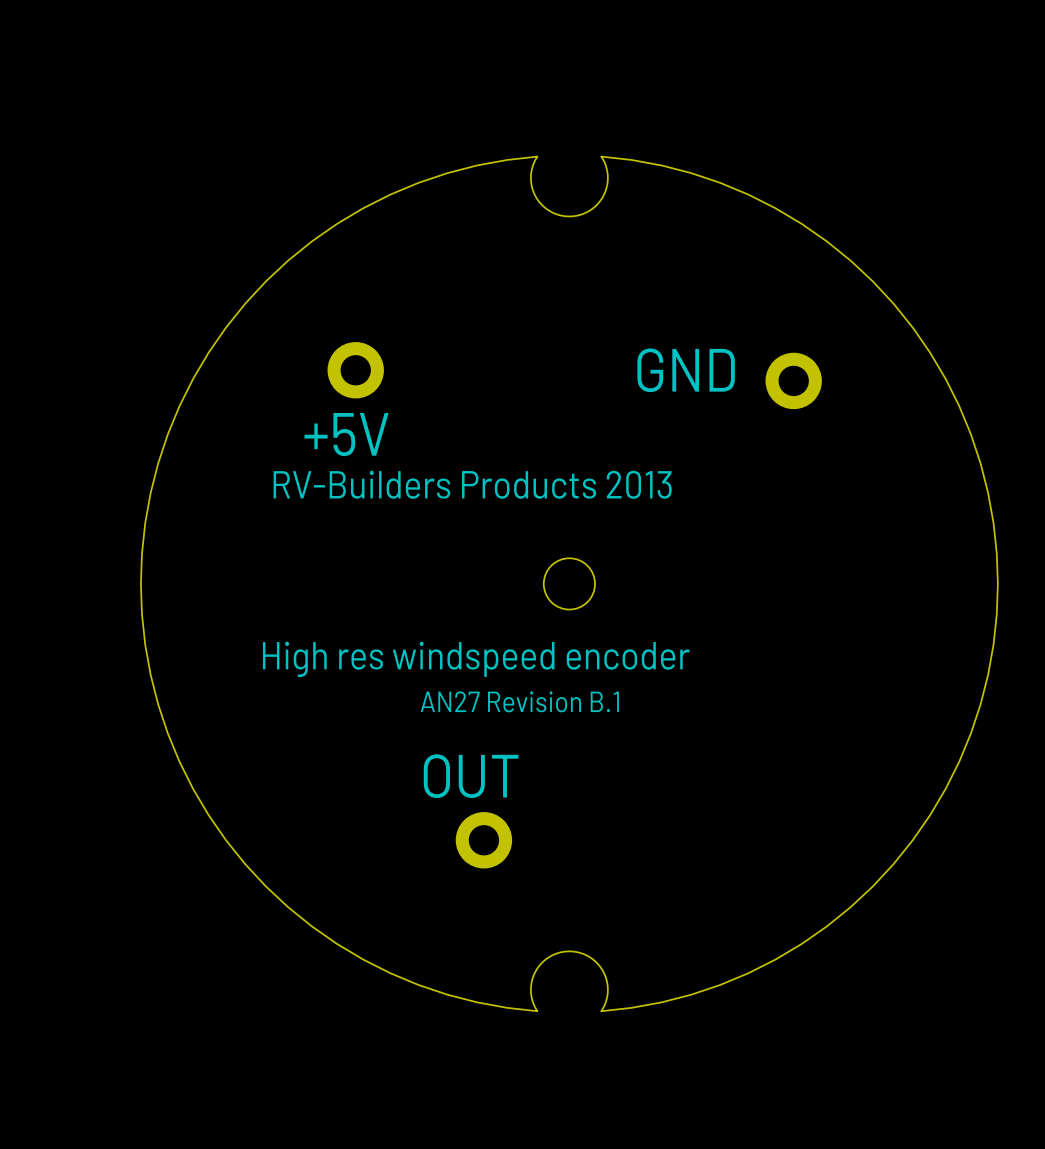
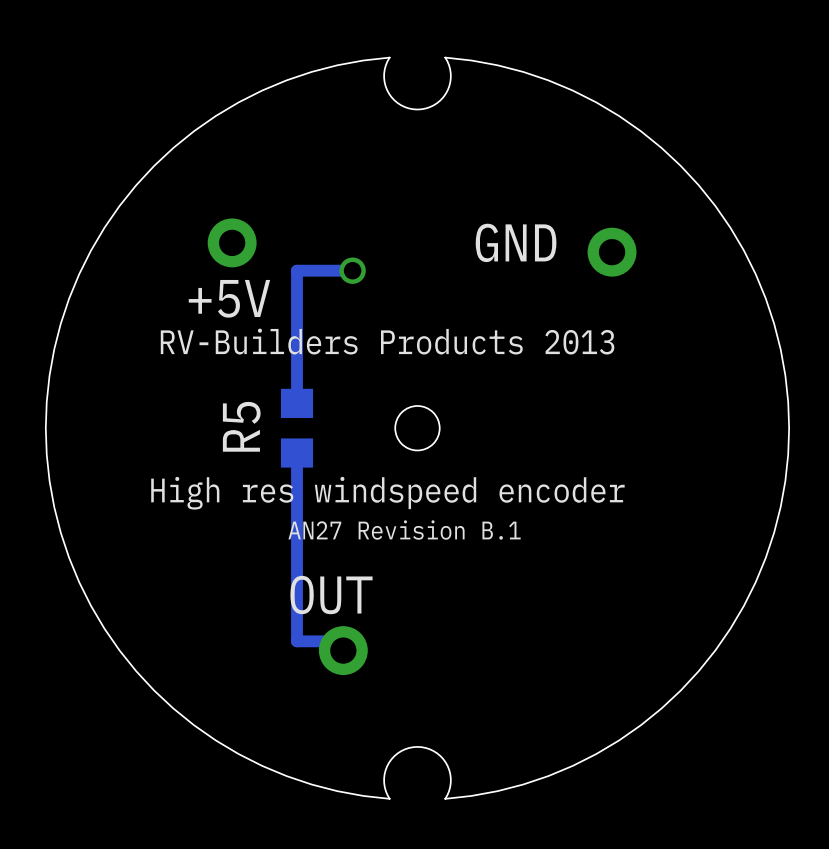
track: none -> (352, 270) (297, 270) (297, 403)
via: none -> (352, 270)
R5: none -> (297, 428)
track: none -> (297, 453) (297, 641) (343, 641) (343, 650)

